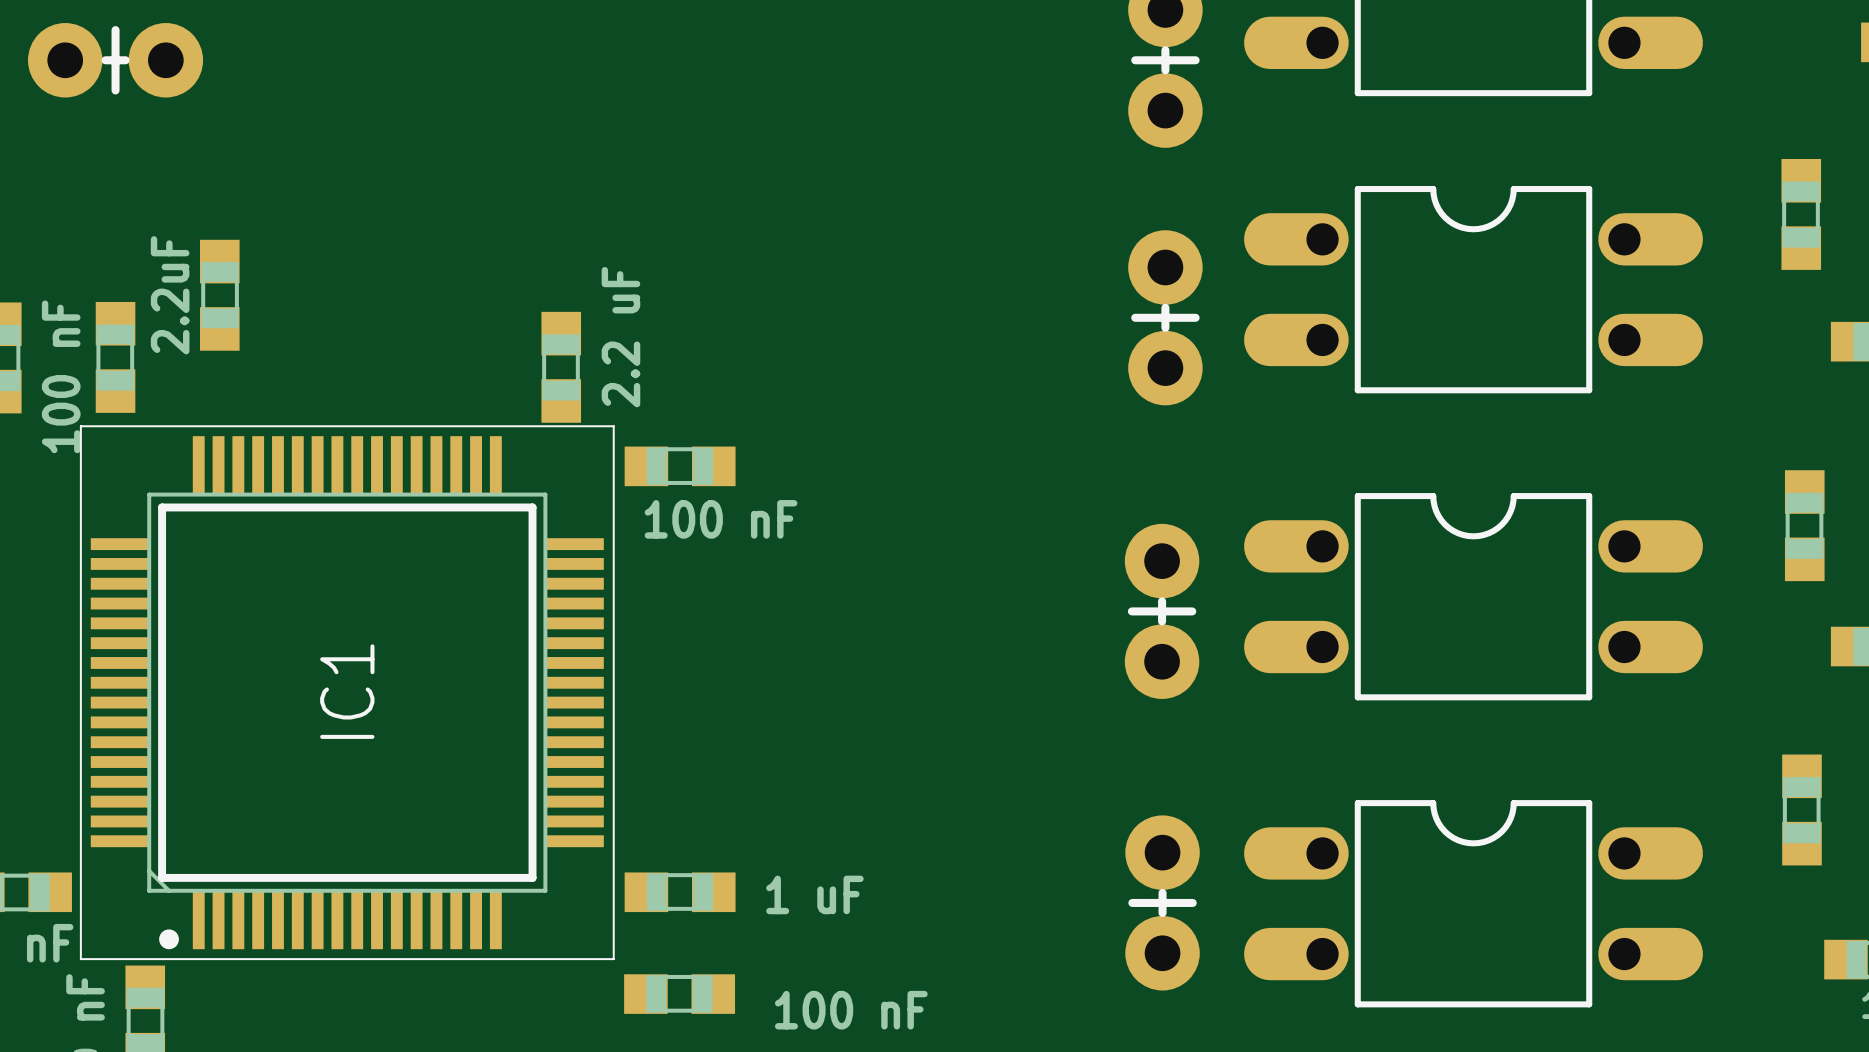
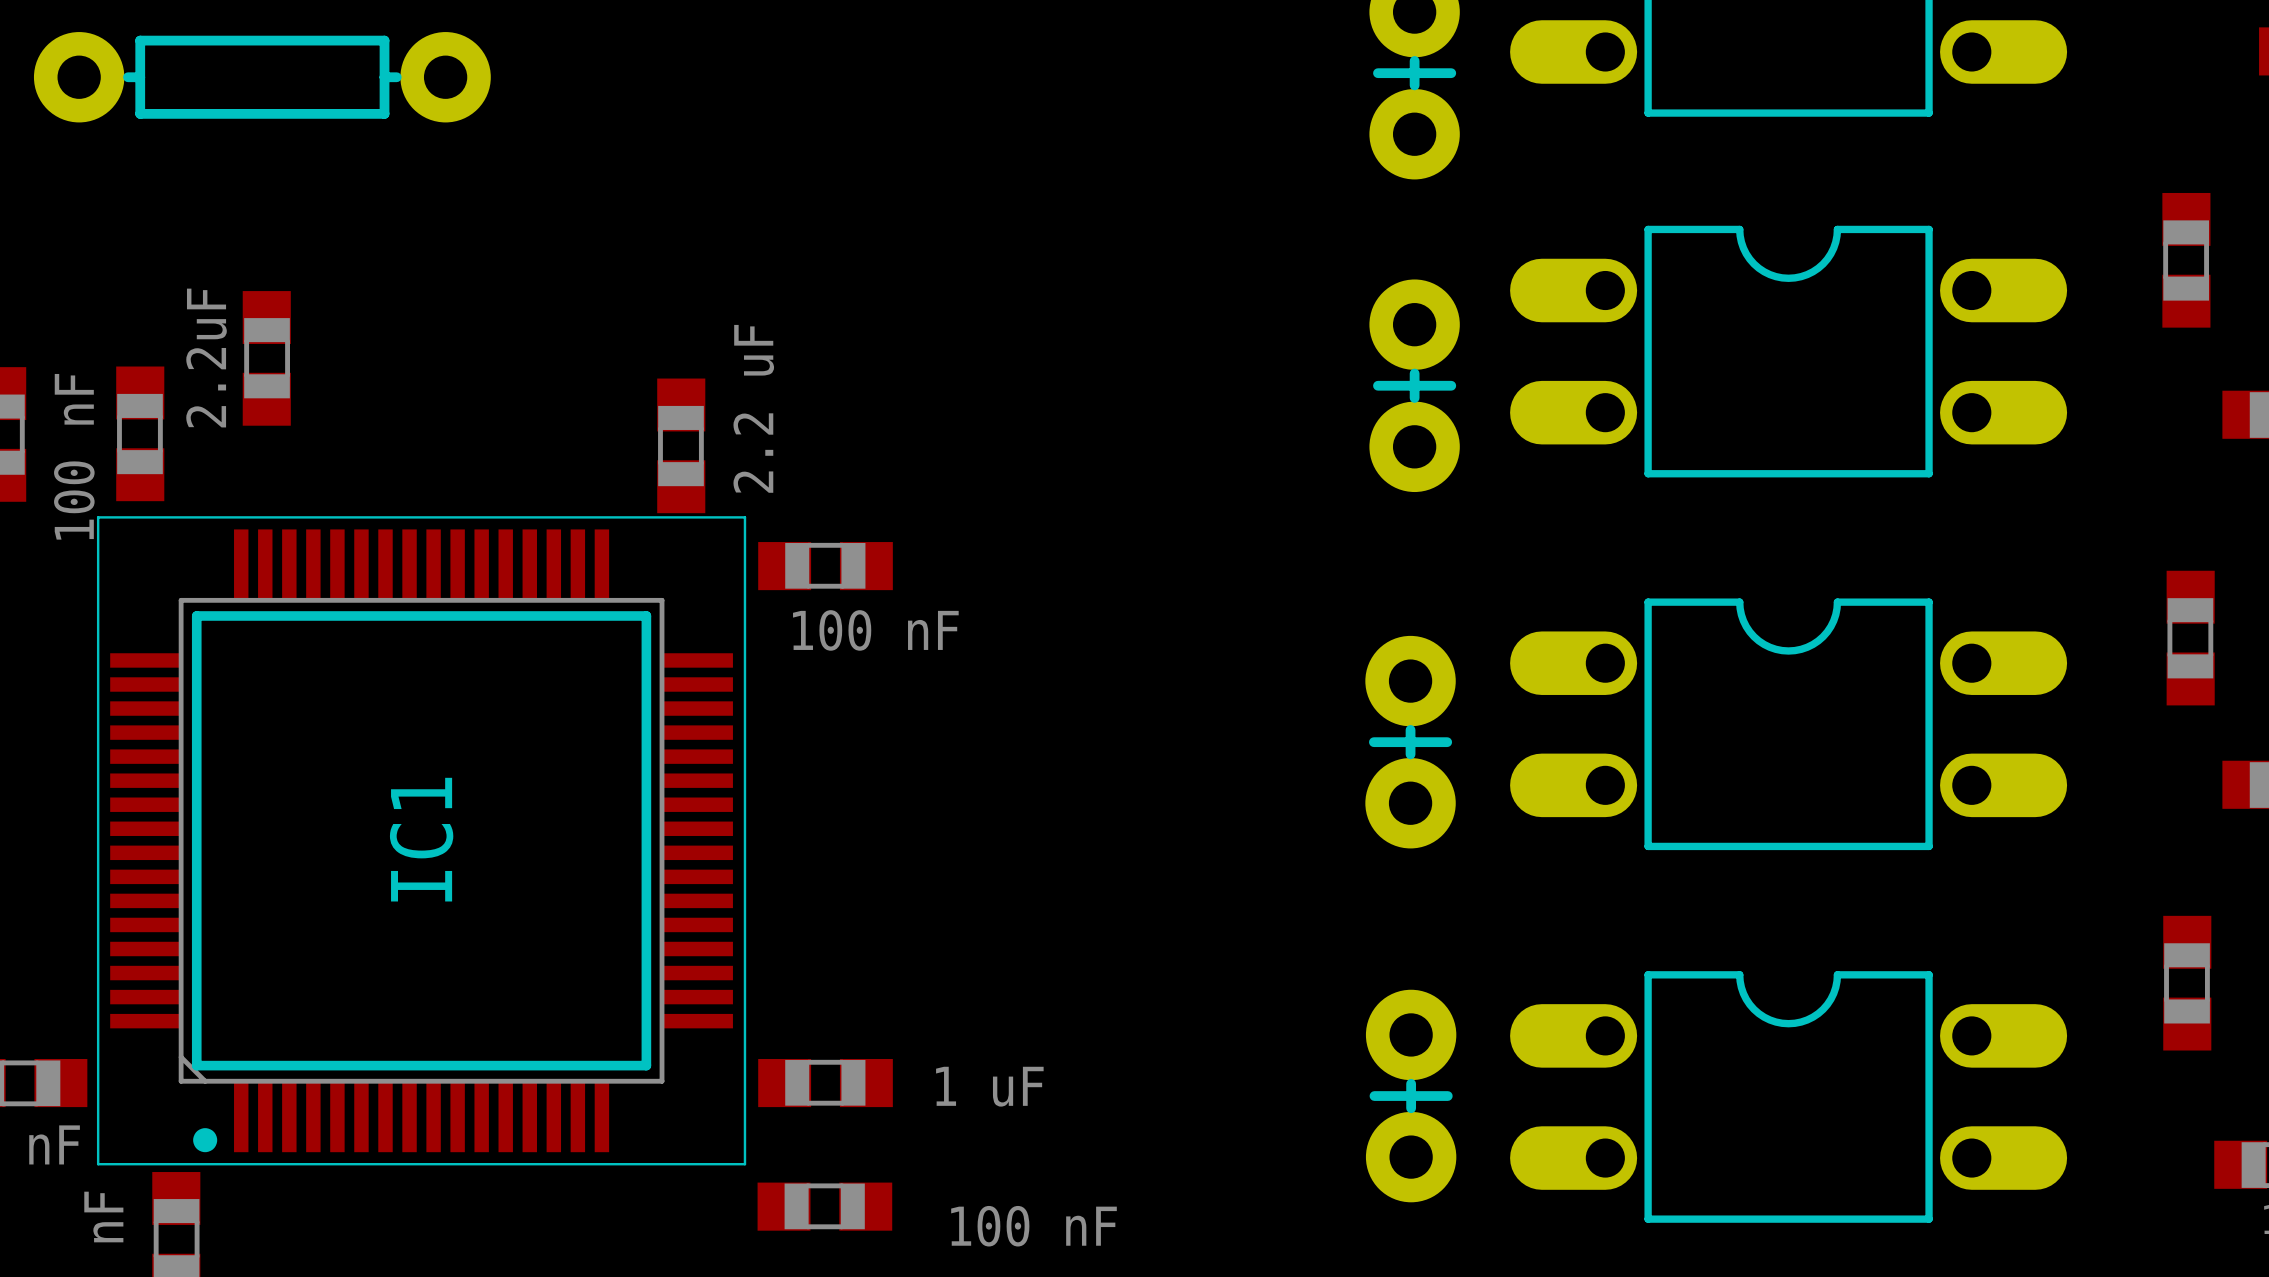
part: (115, 60) -> none
part: none -> (262, 77)

